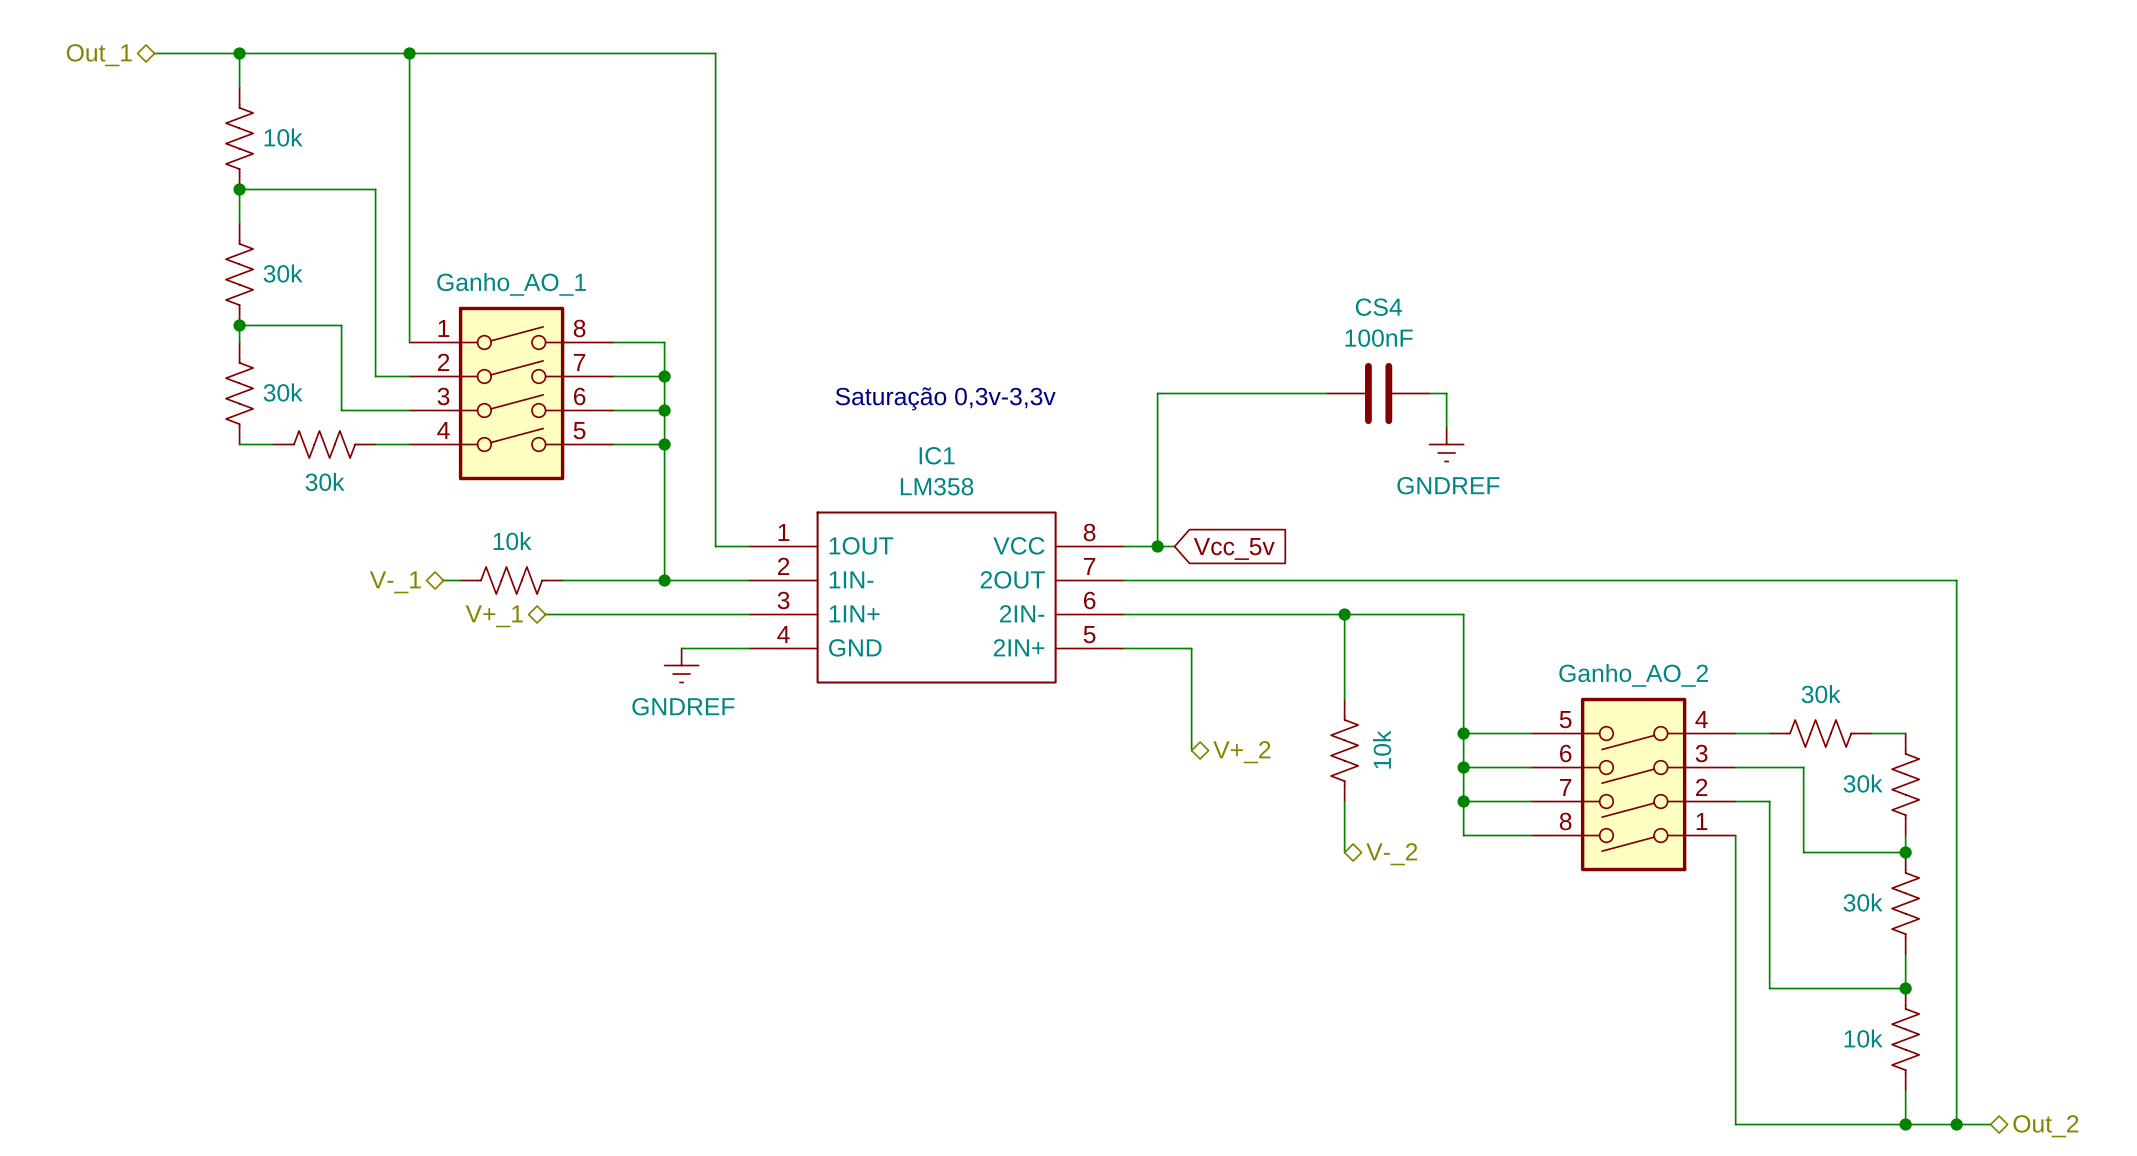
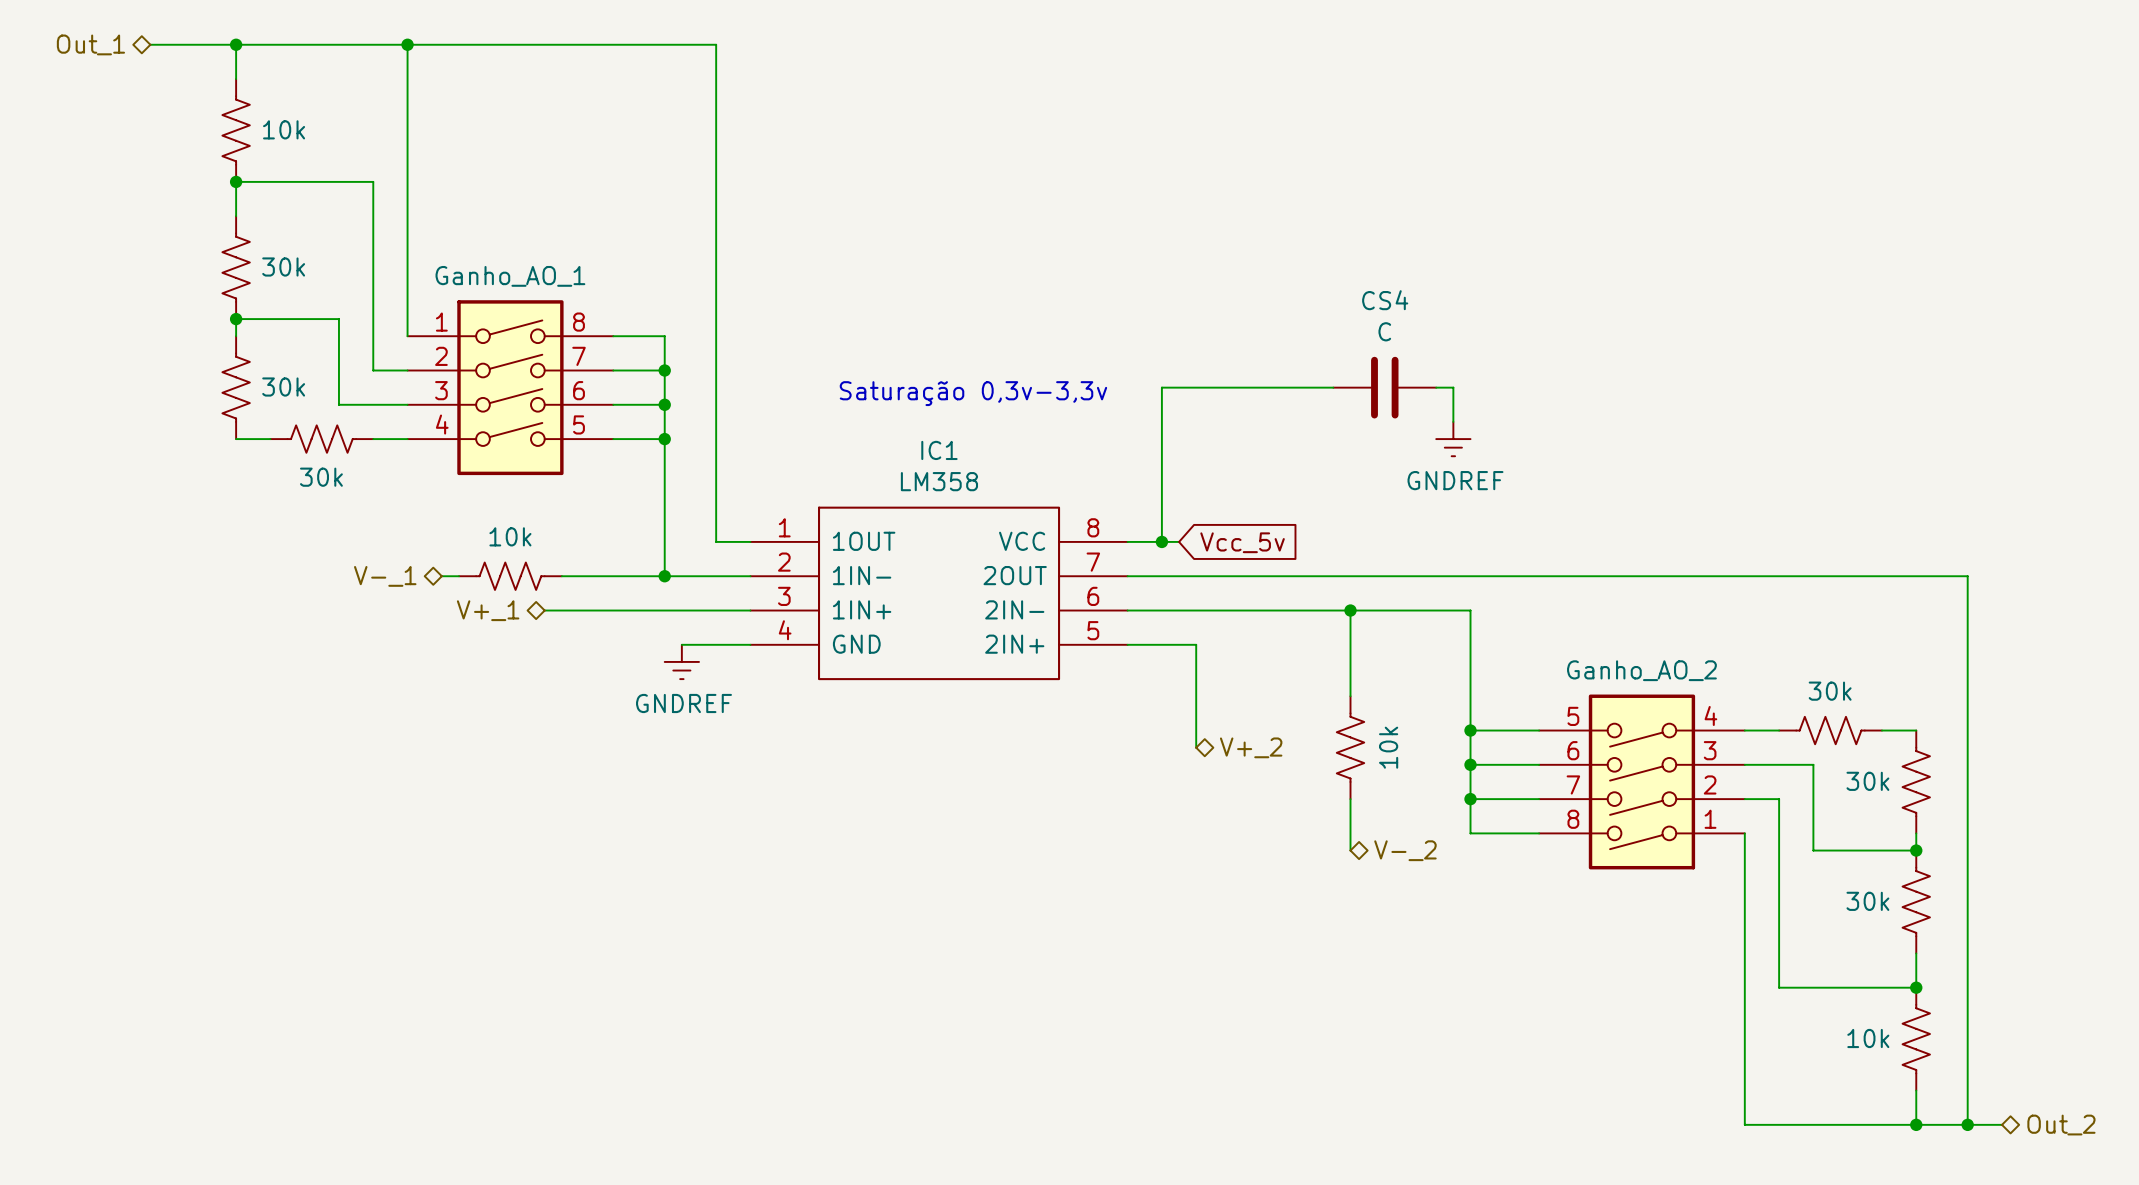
CS4 value: 100nF (1379, 338) -> C (1384, 331)

